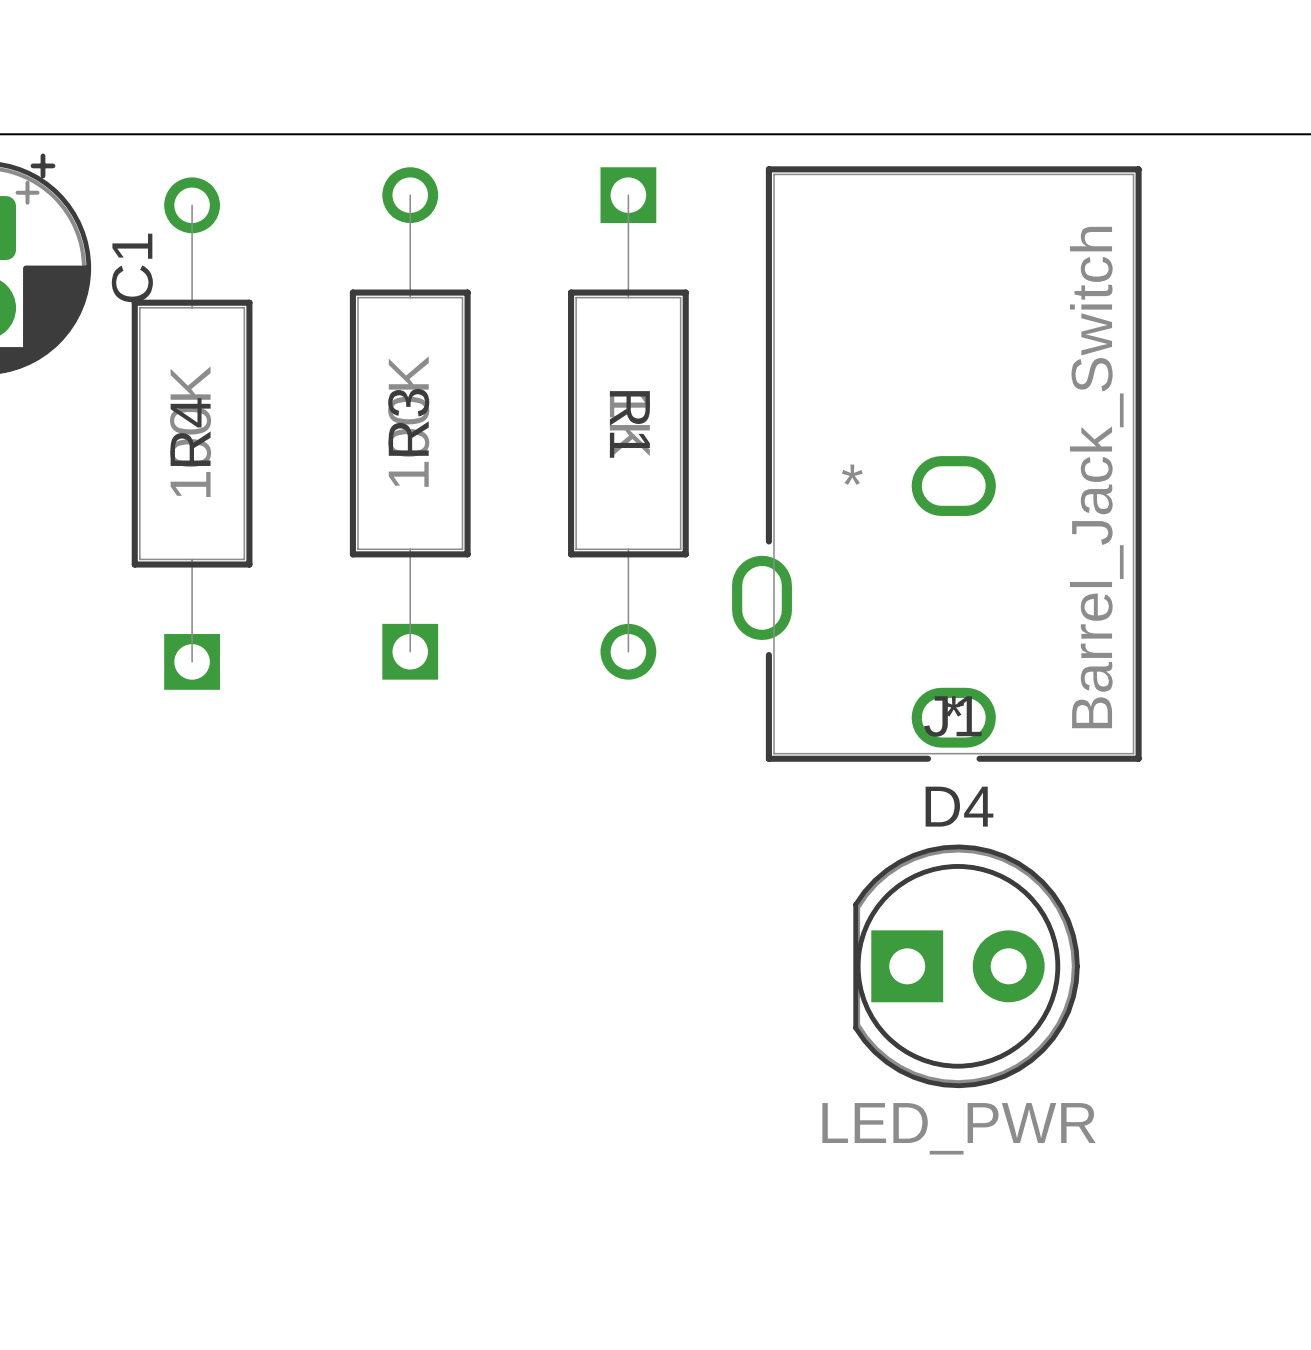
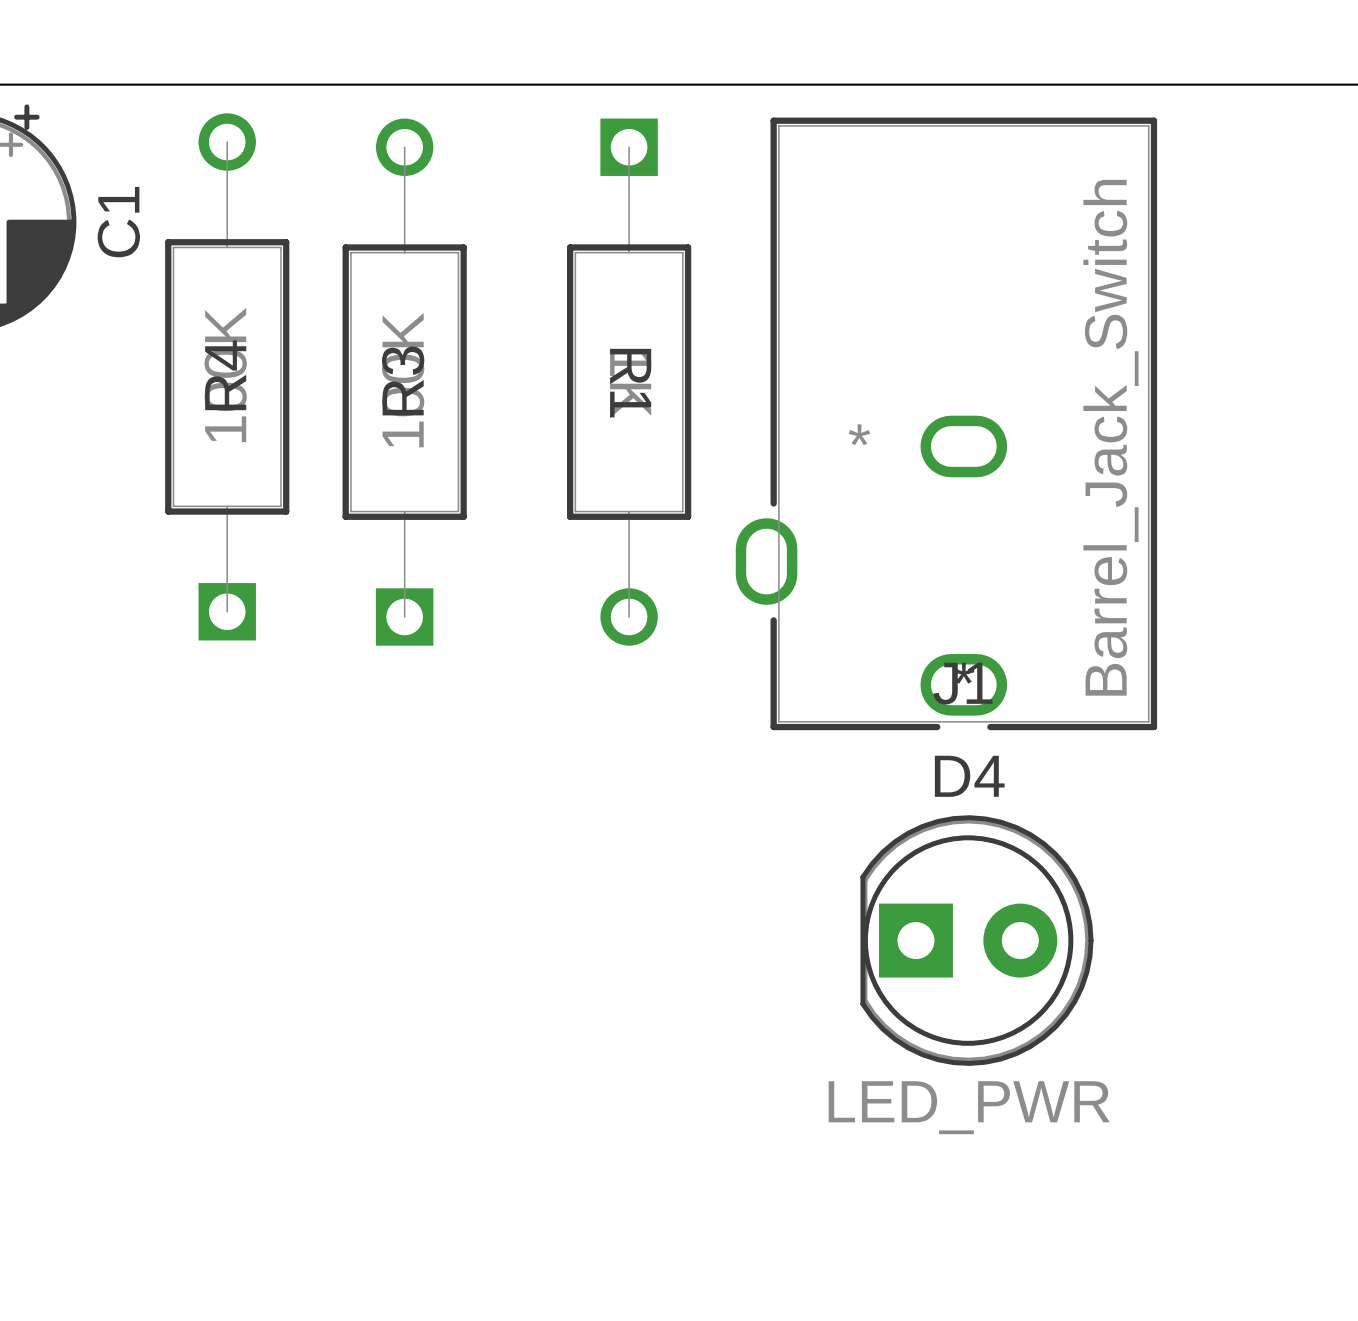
R4 position: (192, 433) -> (227, 376)

